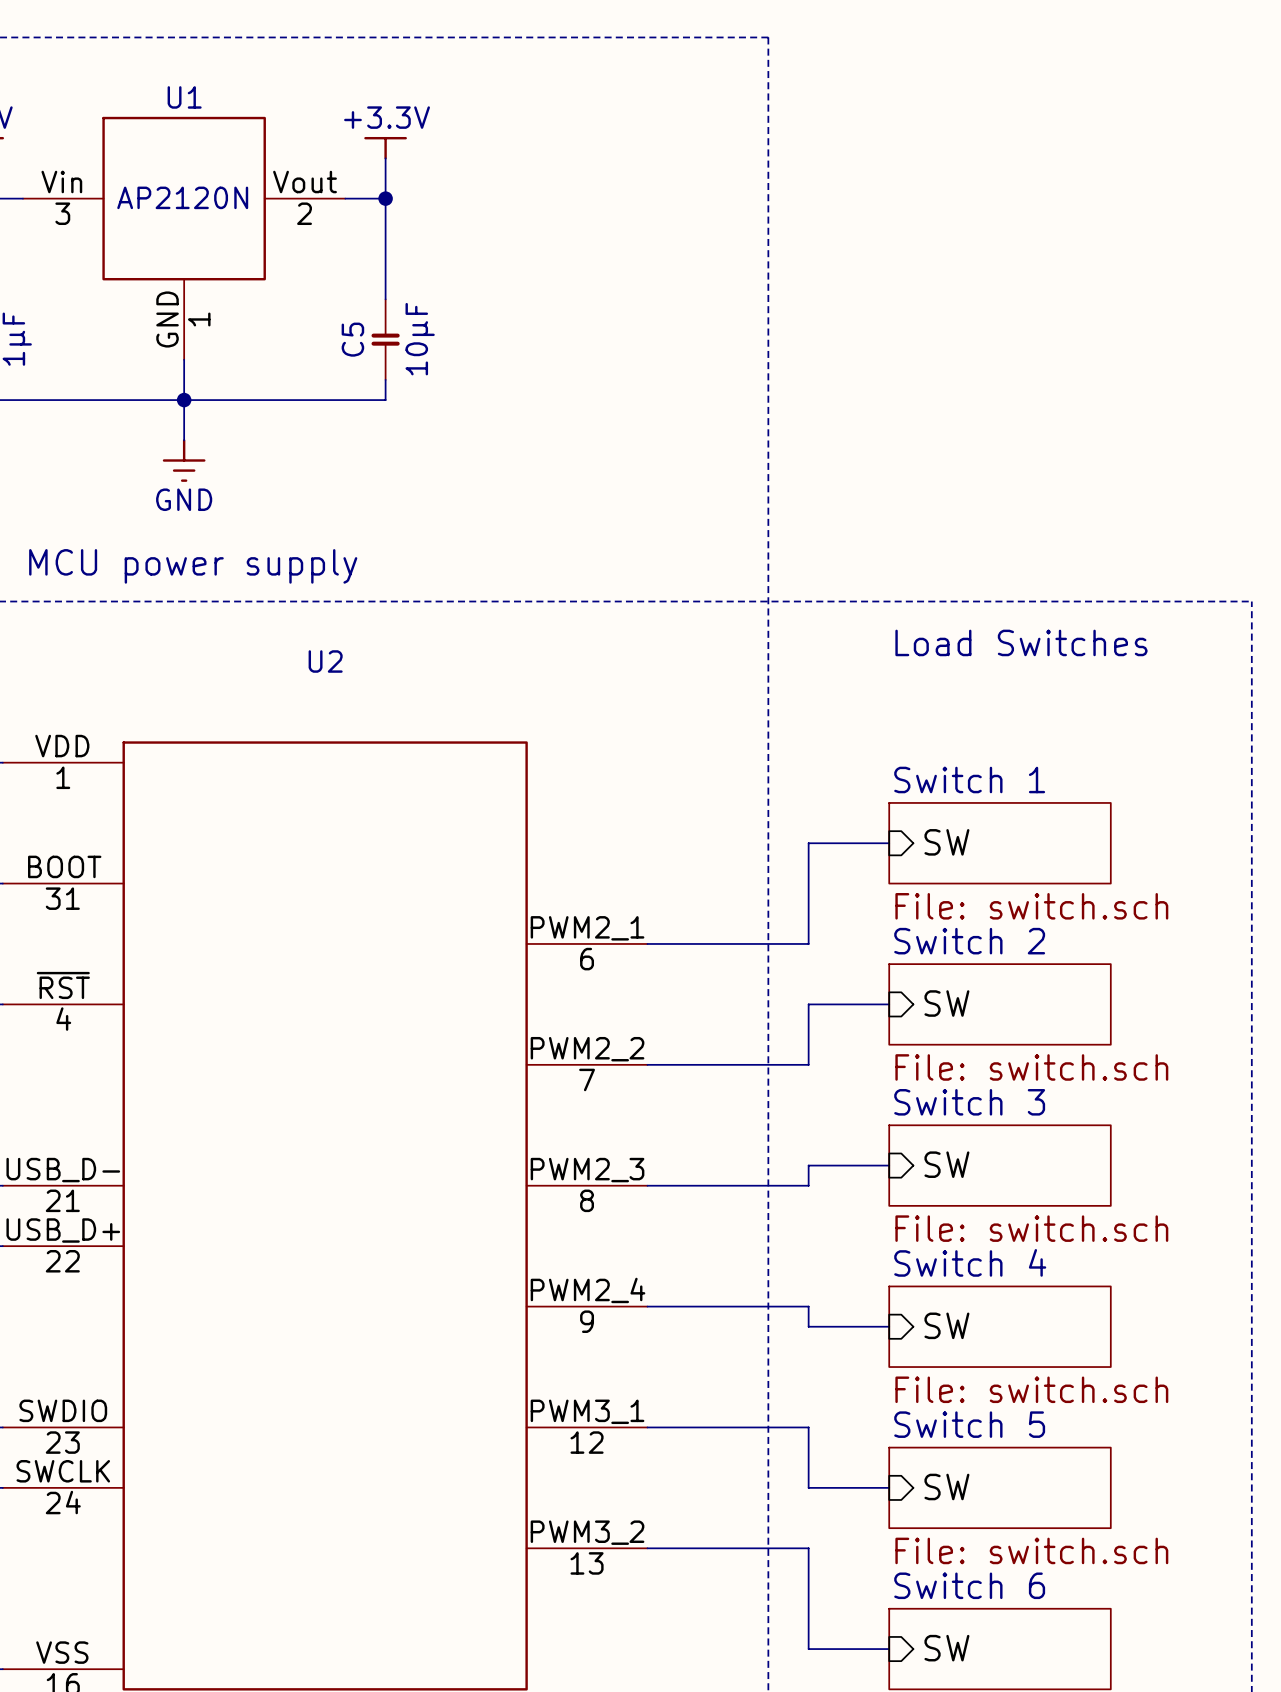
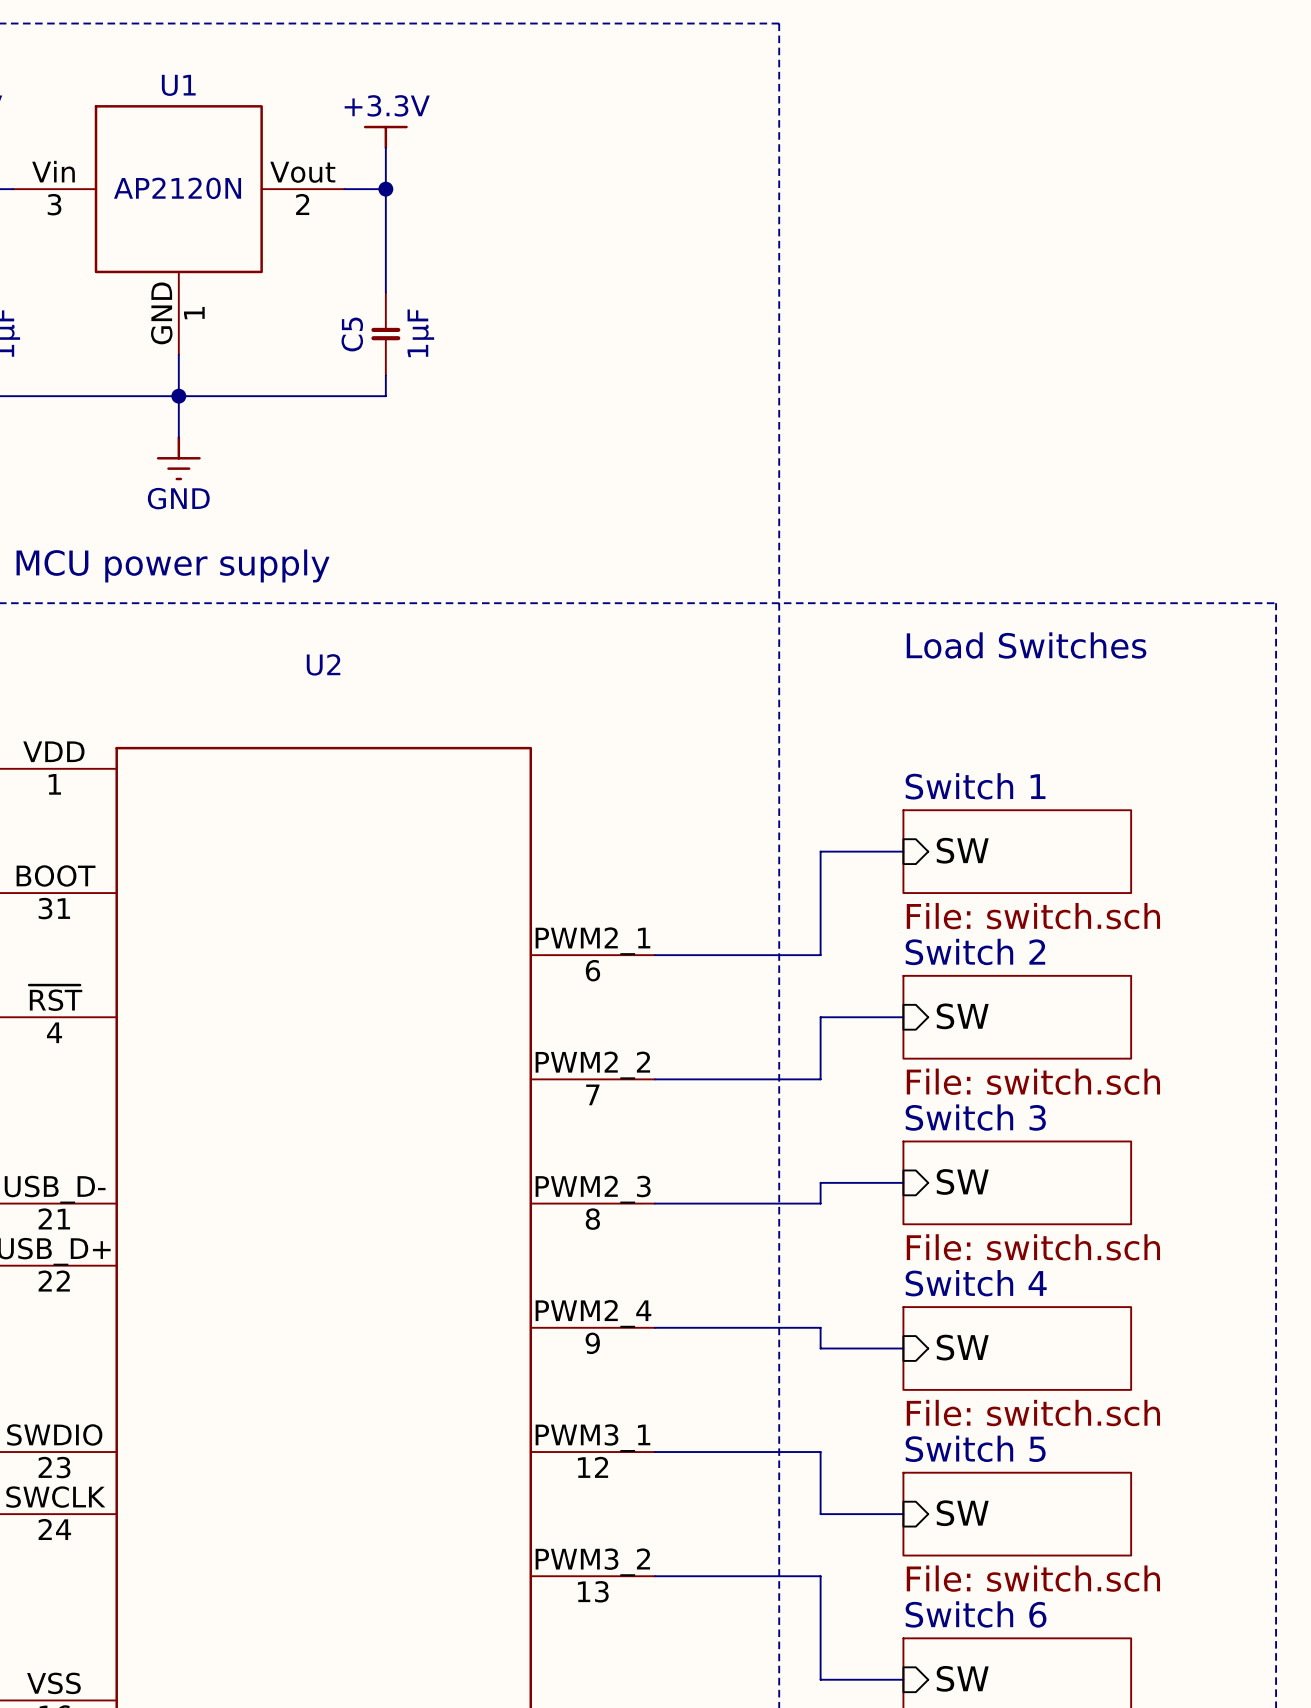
C5 value: 10µF (420, 339) -> 1µF (420, 333)

